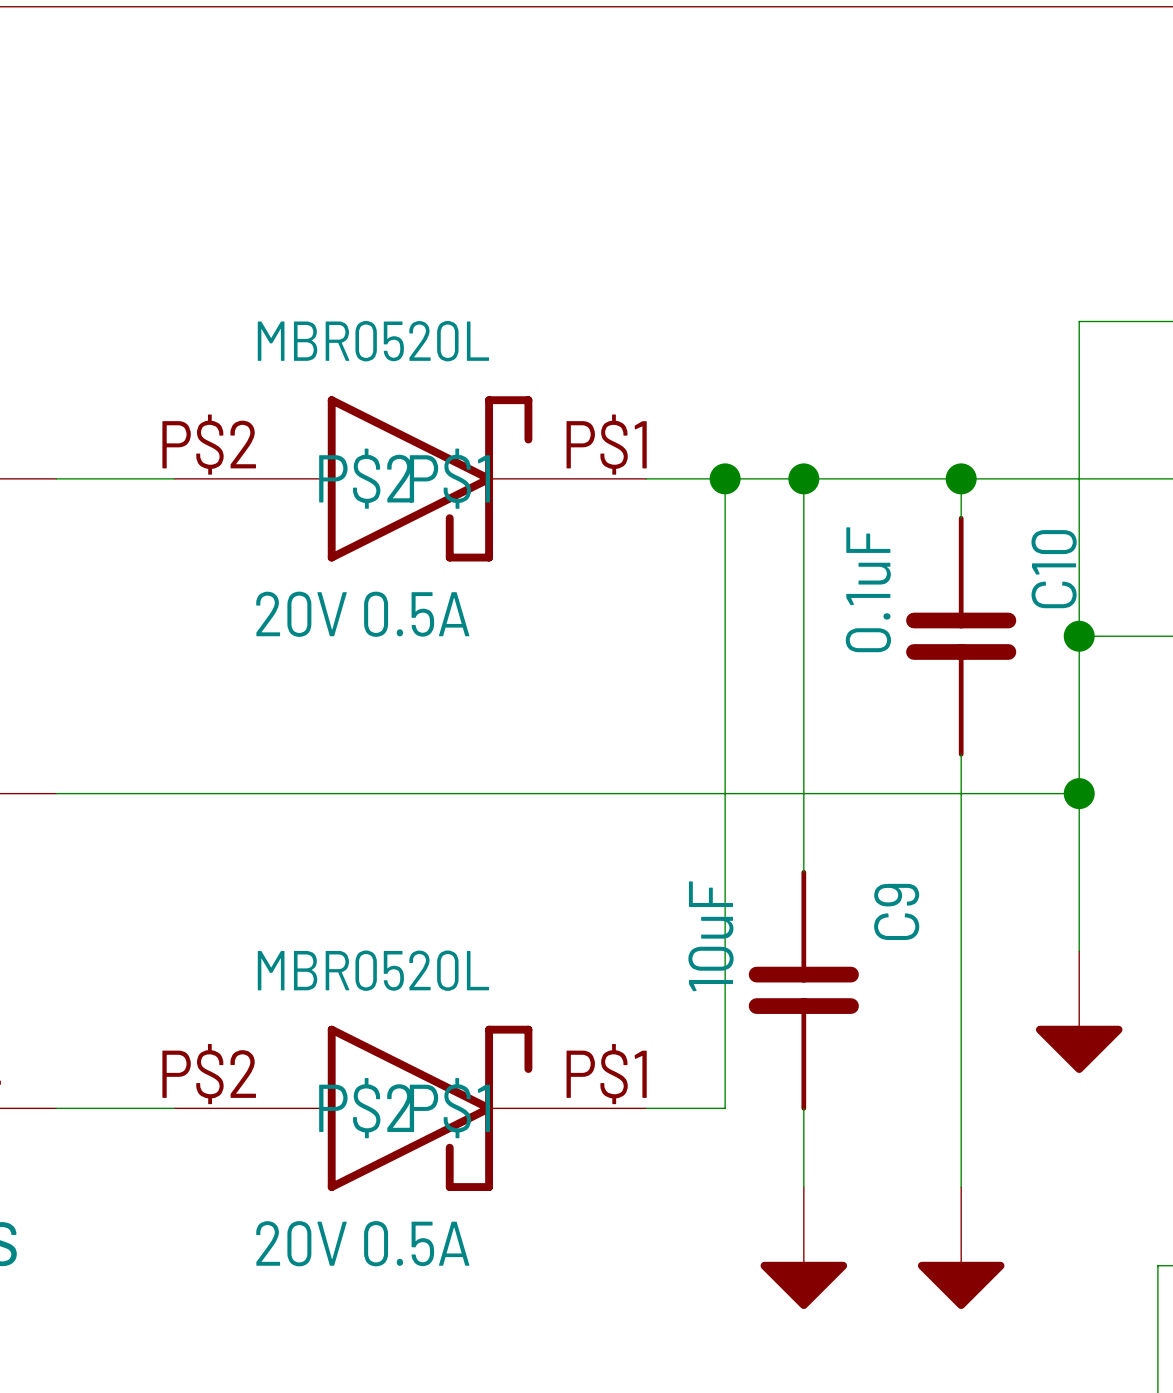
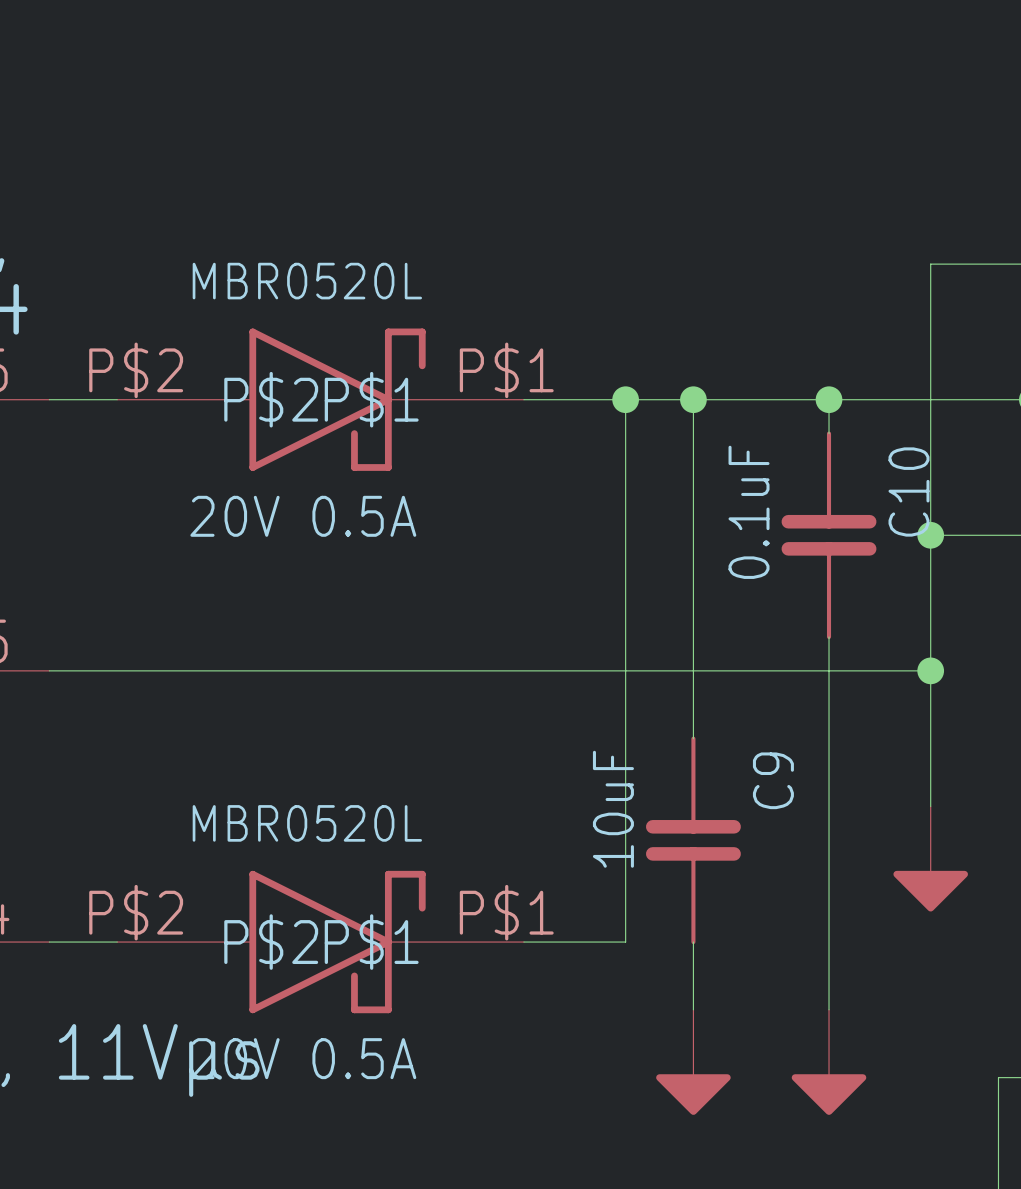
part position: (410, 478) -> (320, 399)
part position: (410, 1108) -> (320, 942)

